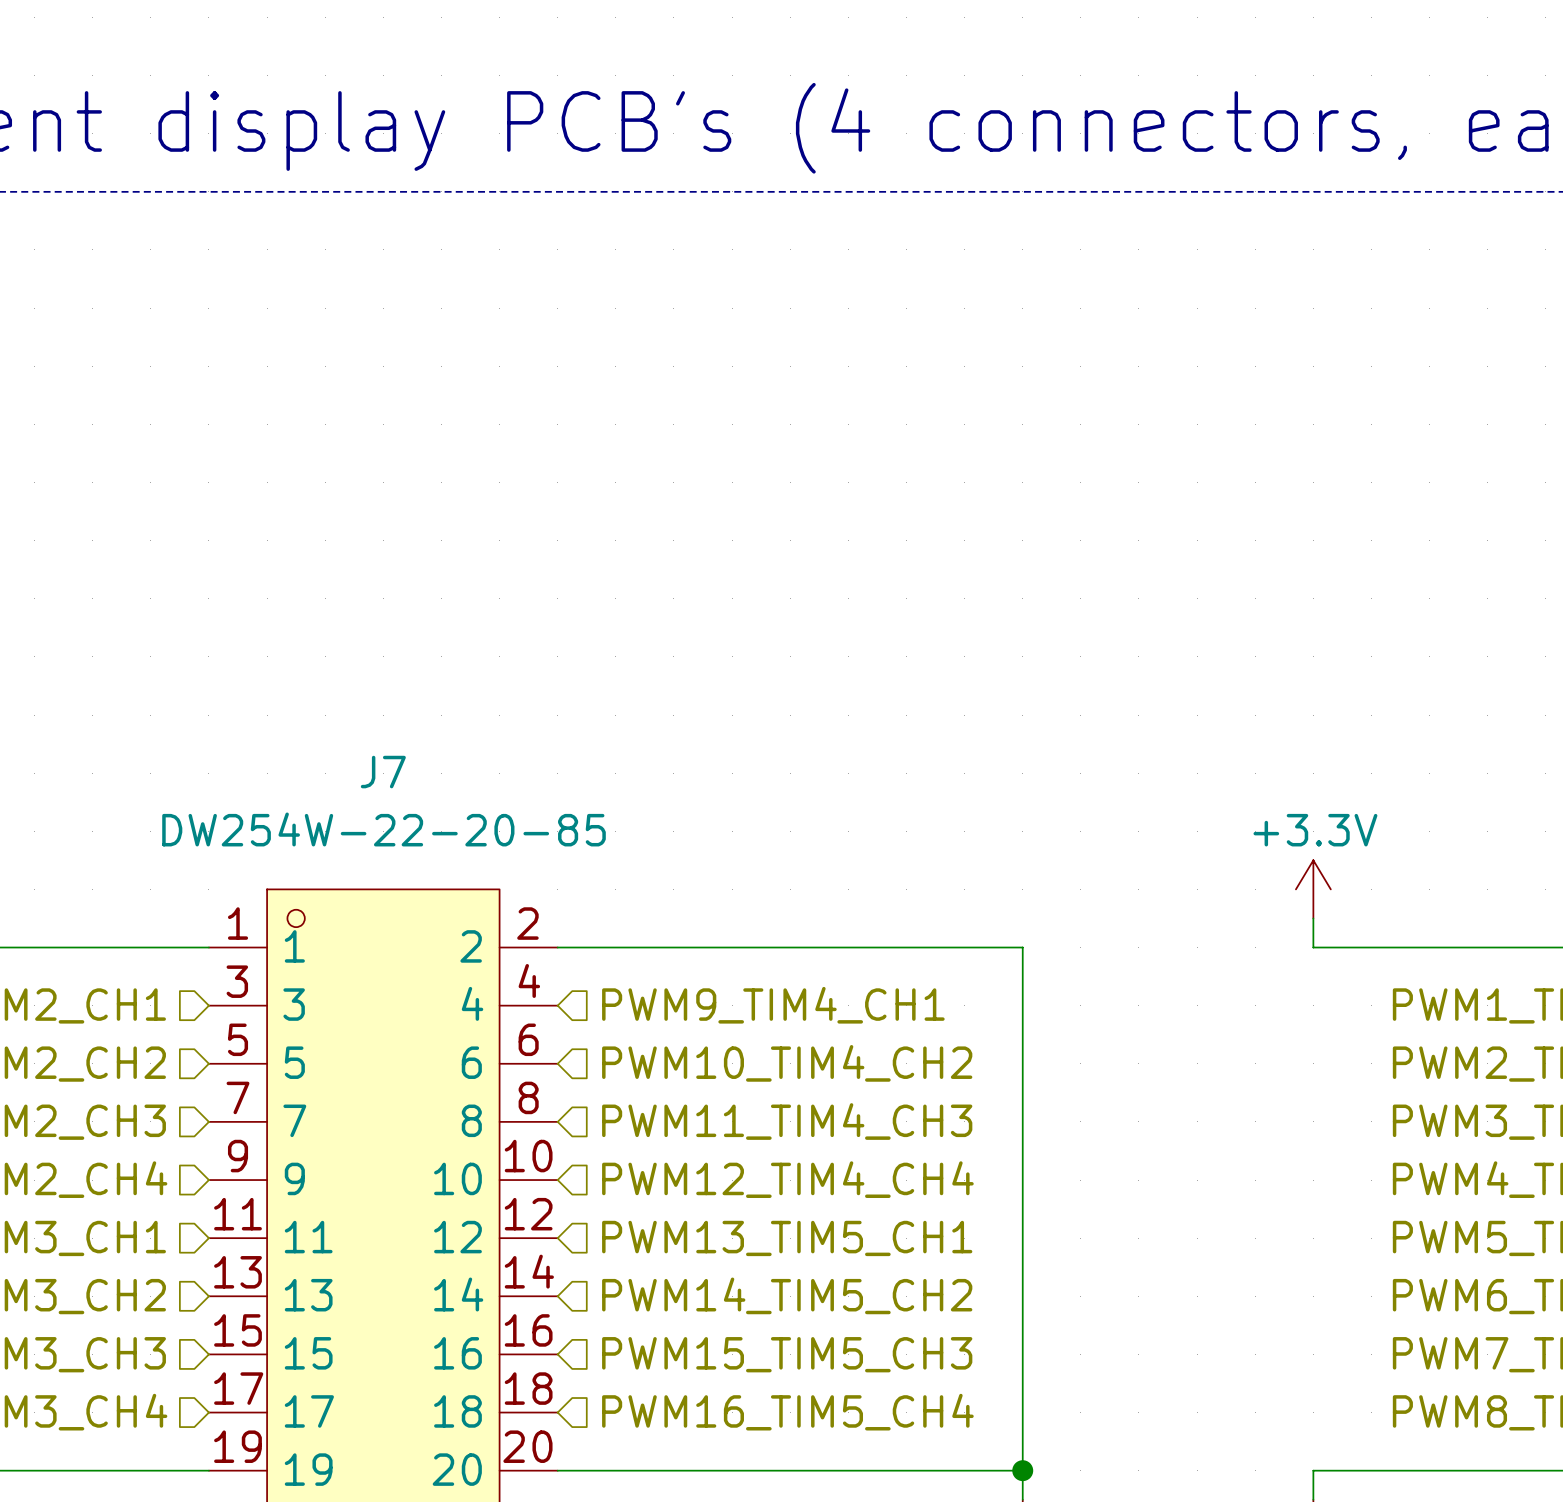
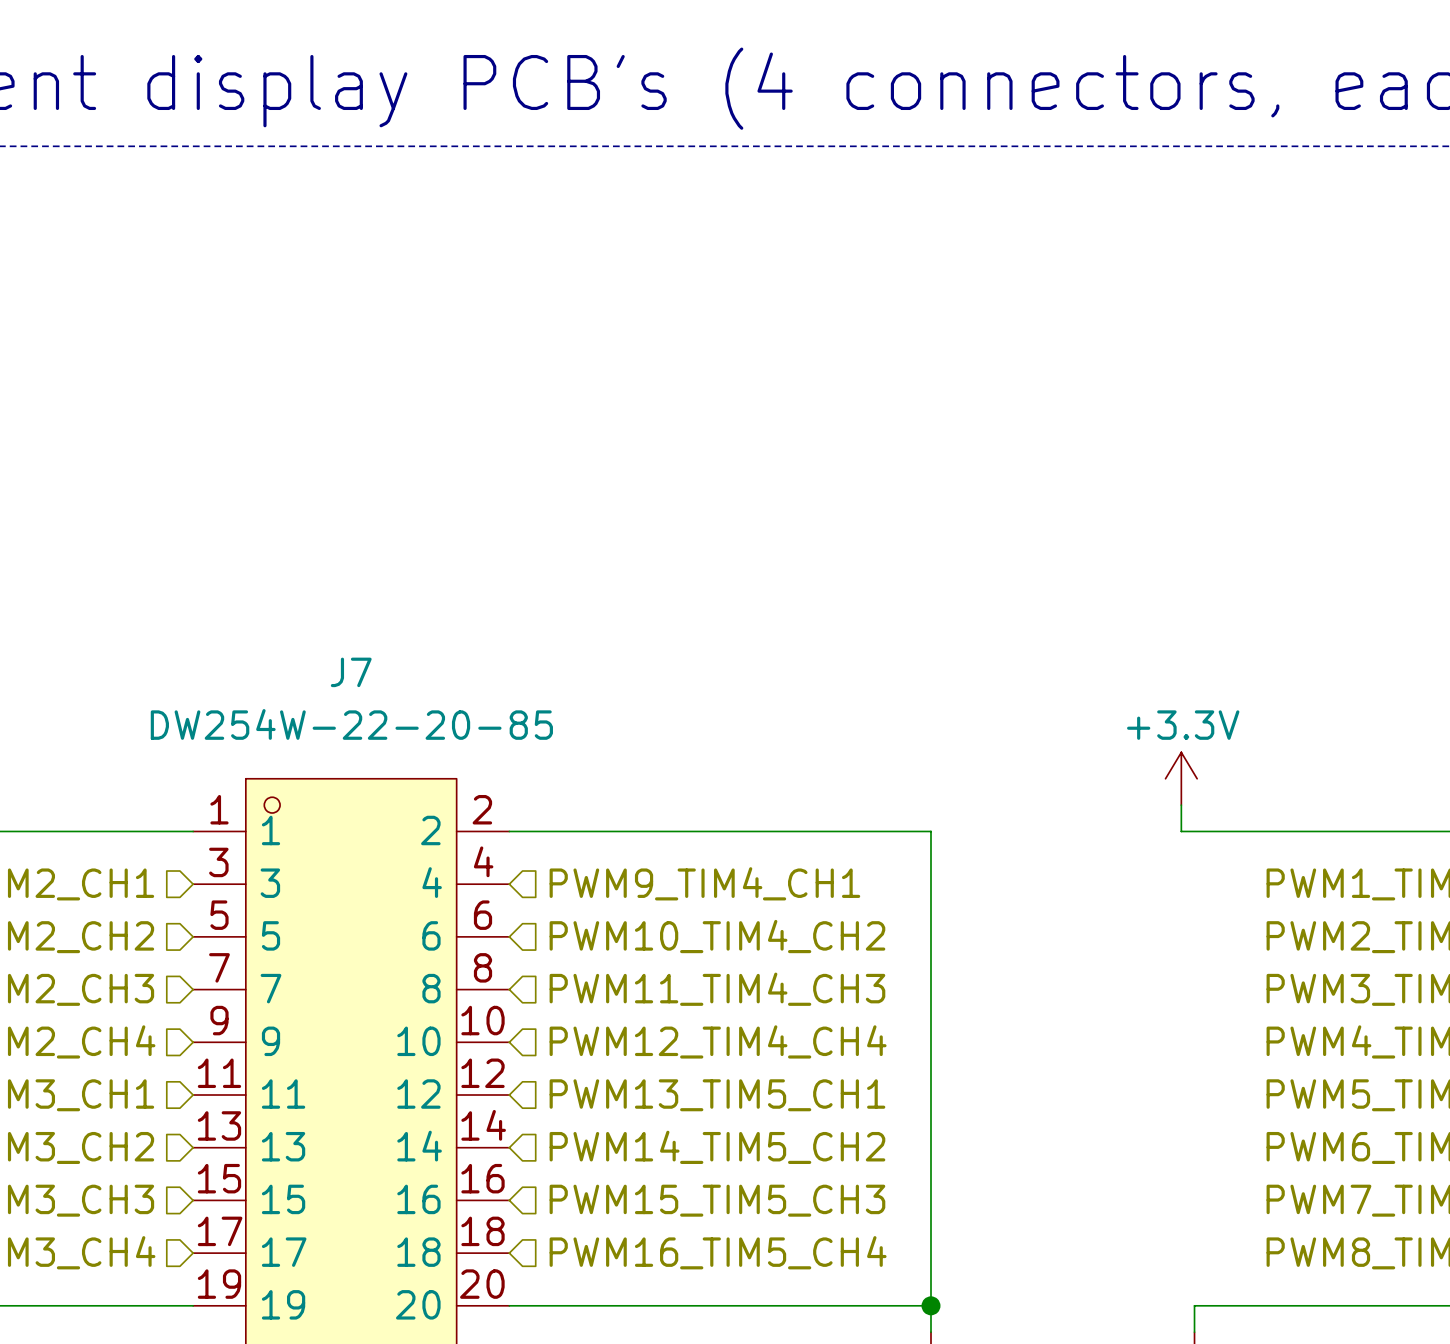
power symbol position: +3.3V (1313, 889) -> +3.3V (1181, 778)
wire: (1313, 918) (1313, 947) -> (1181, 805) (1181, 831) (1194, 831)

